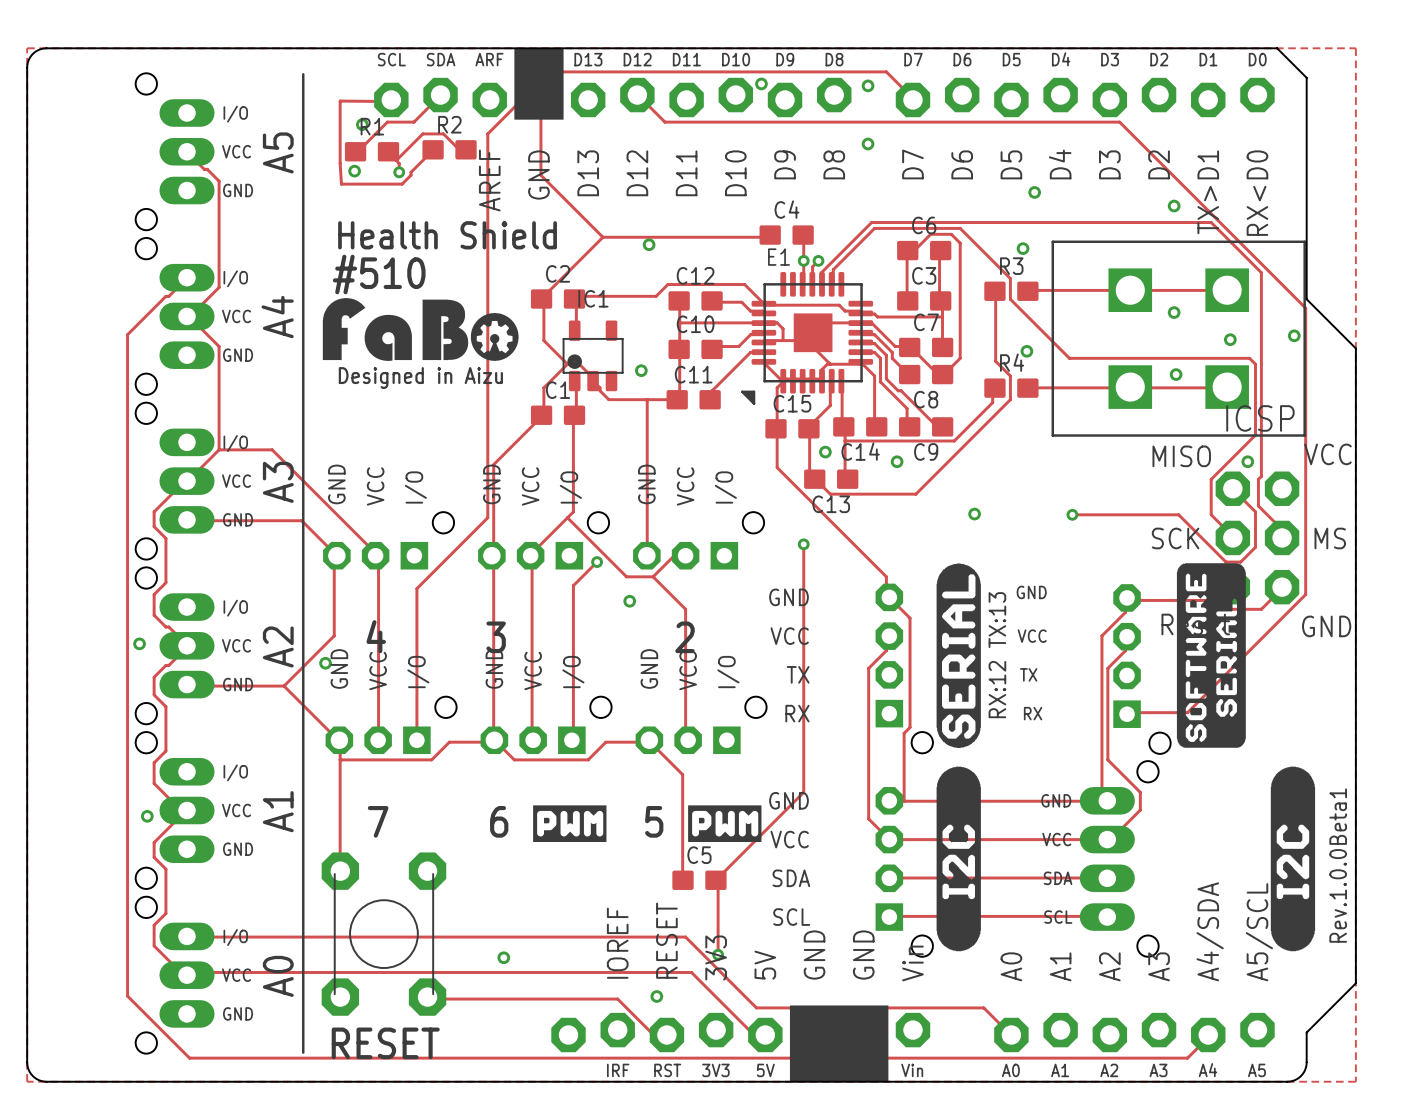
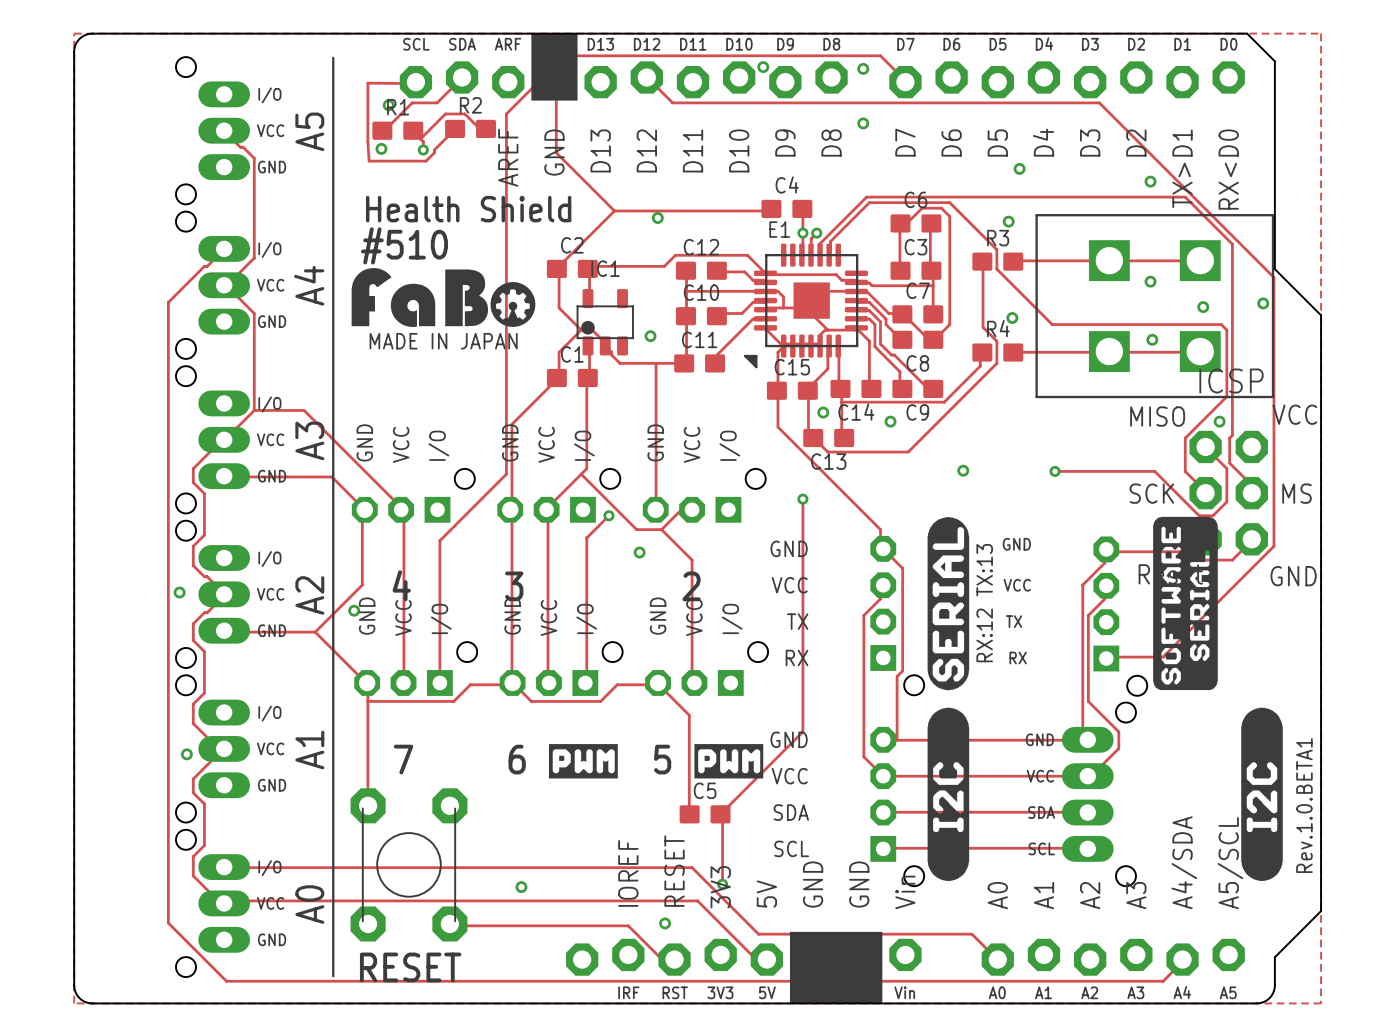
text: Designed in Aizu (420, 378) -> MADE IN JAPAN (443, 341)
text: Rev.1.0.0Beta1 (1338, 865) -> Rev.1.0.BETA1 (1304, 805)

